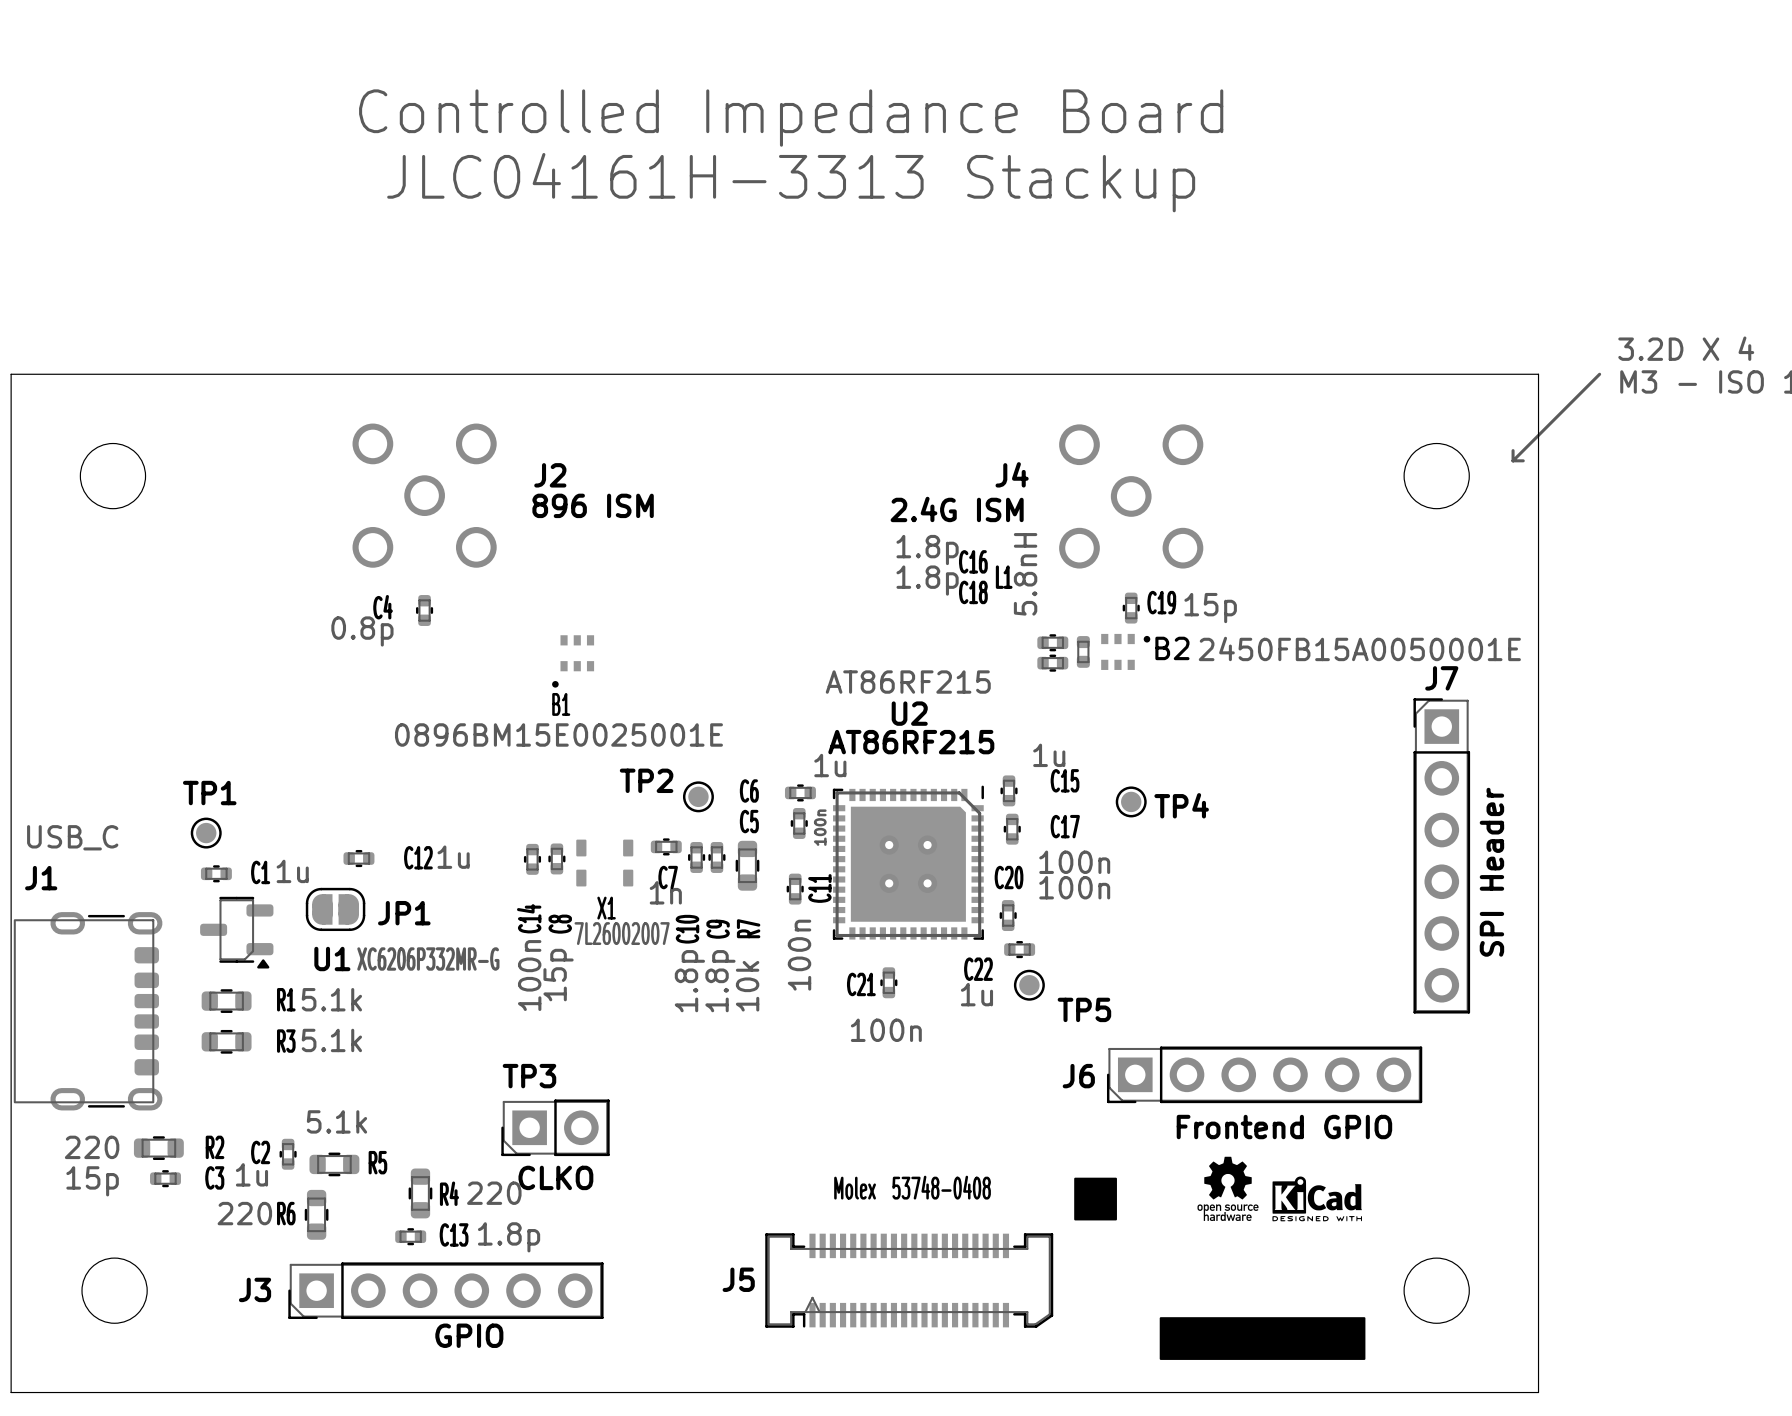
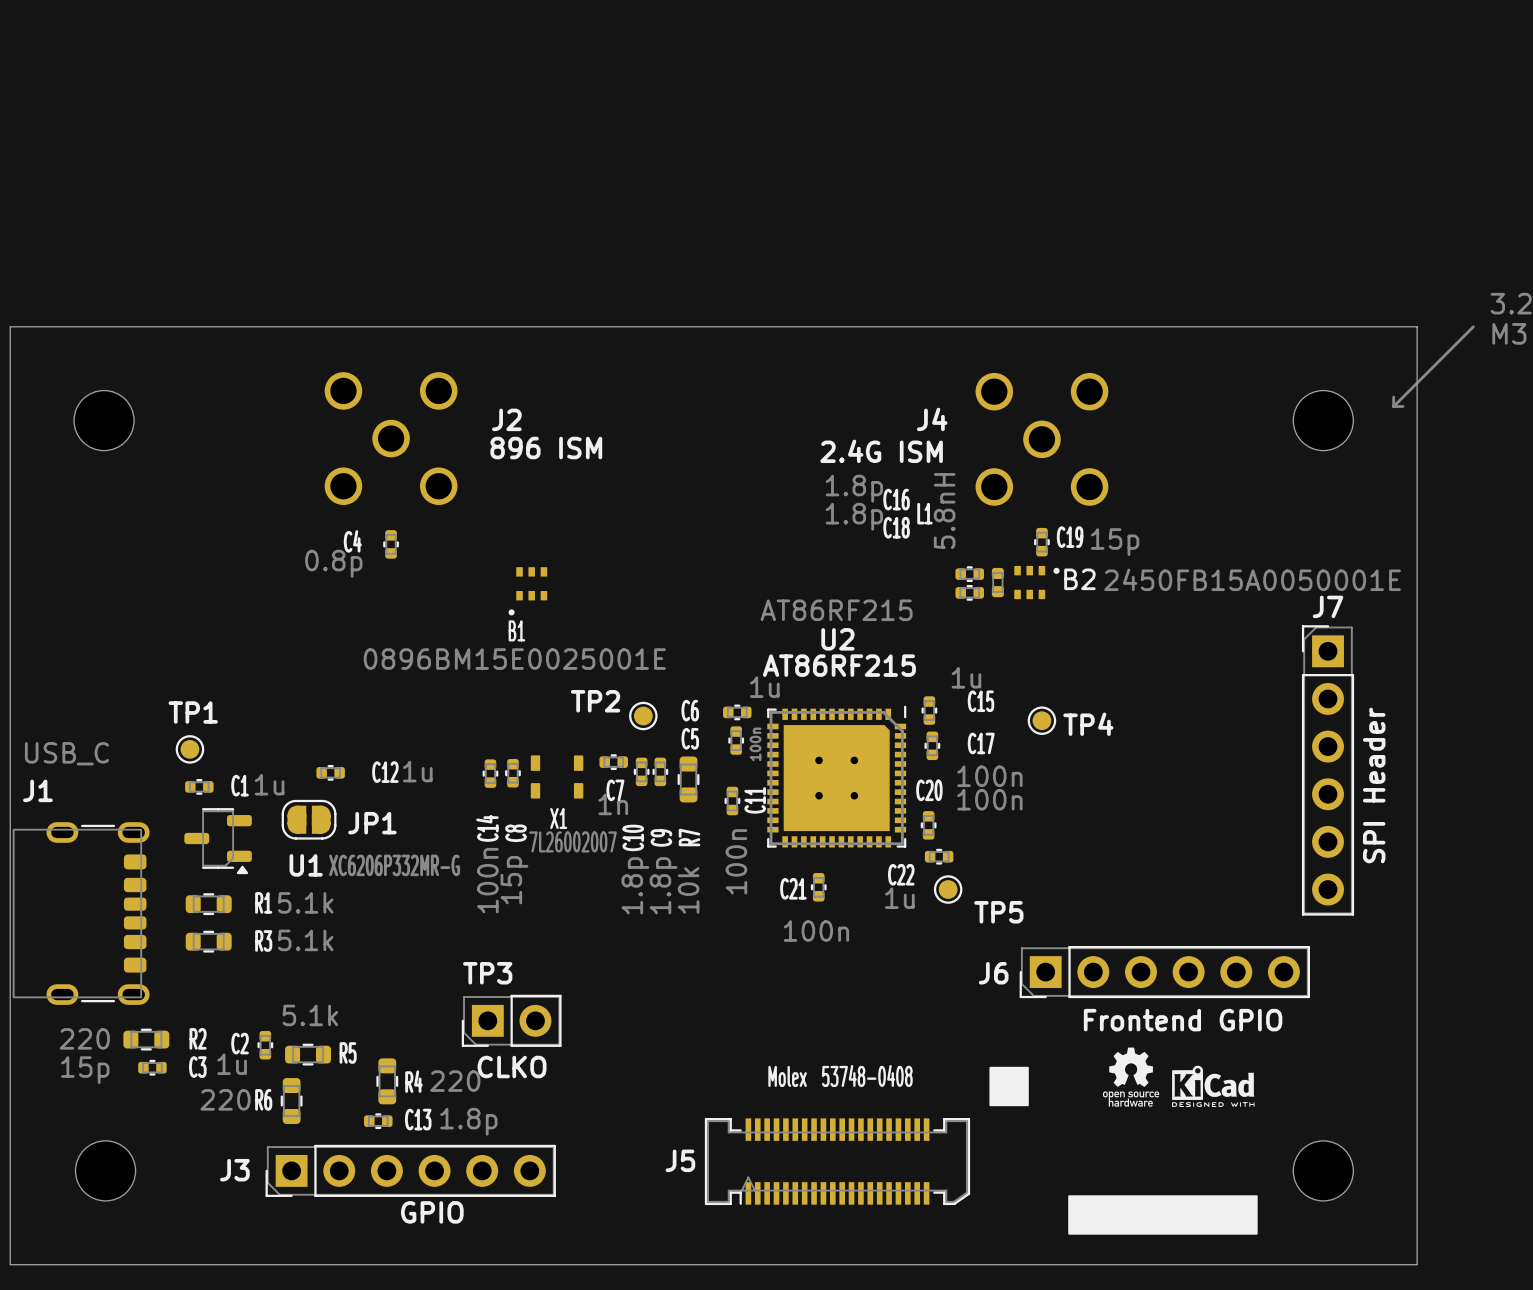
text: Controlled Impedance Board (791, 118) -> none
text: JLC04161H-3313 Stackup (791, 182) -> none

